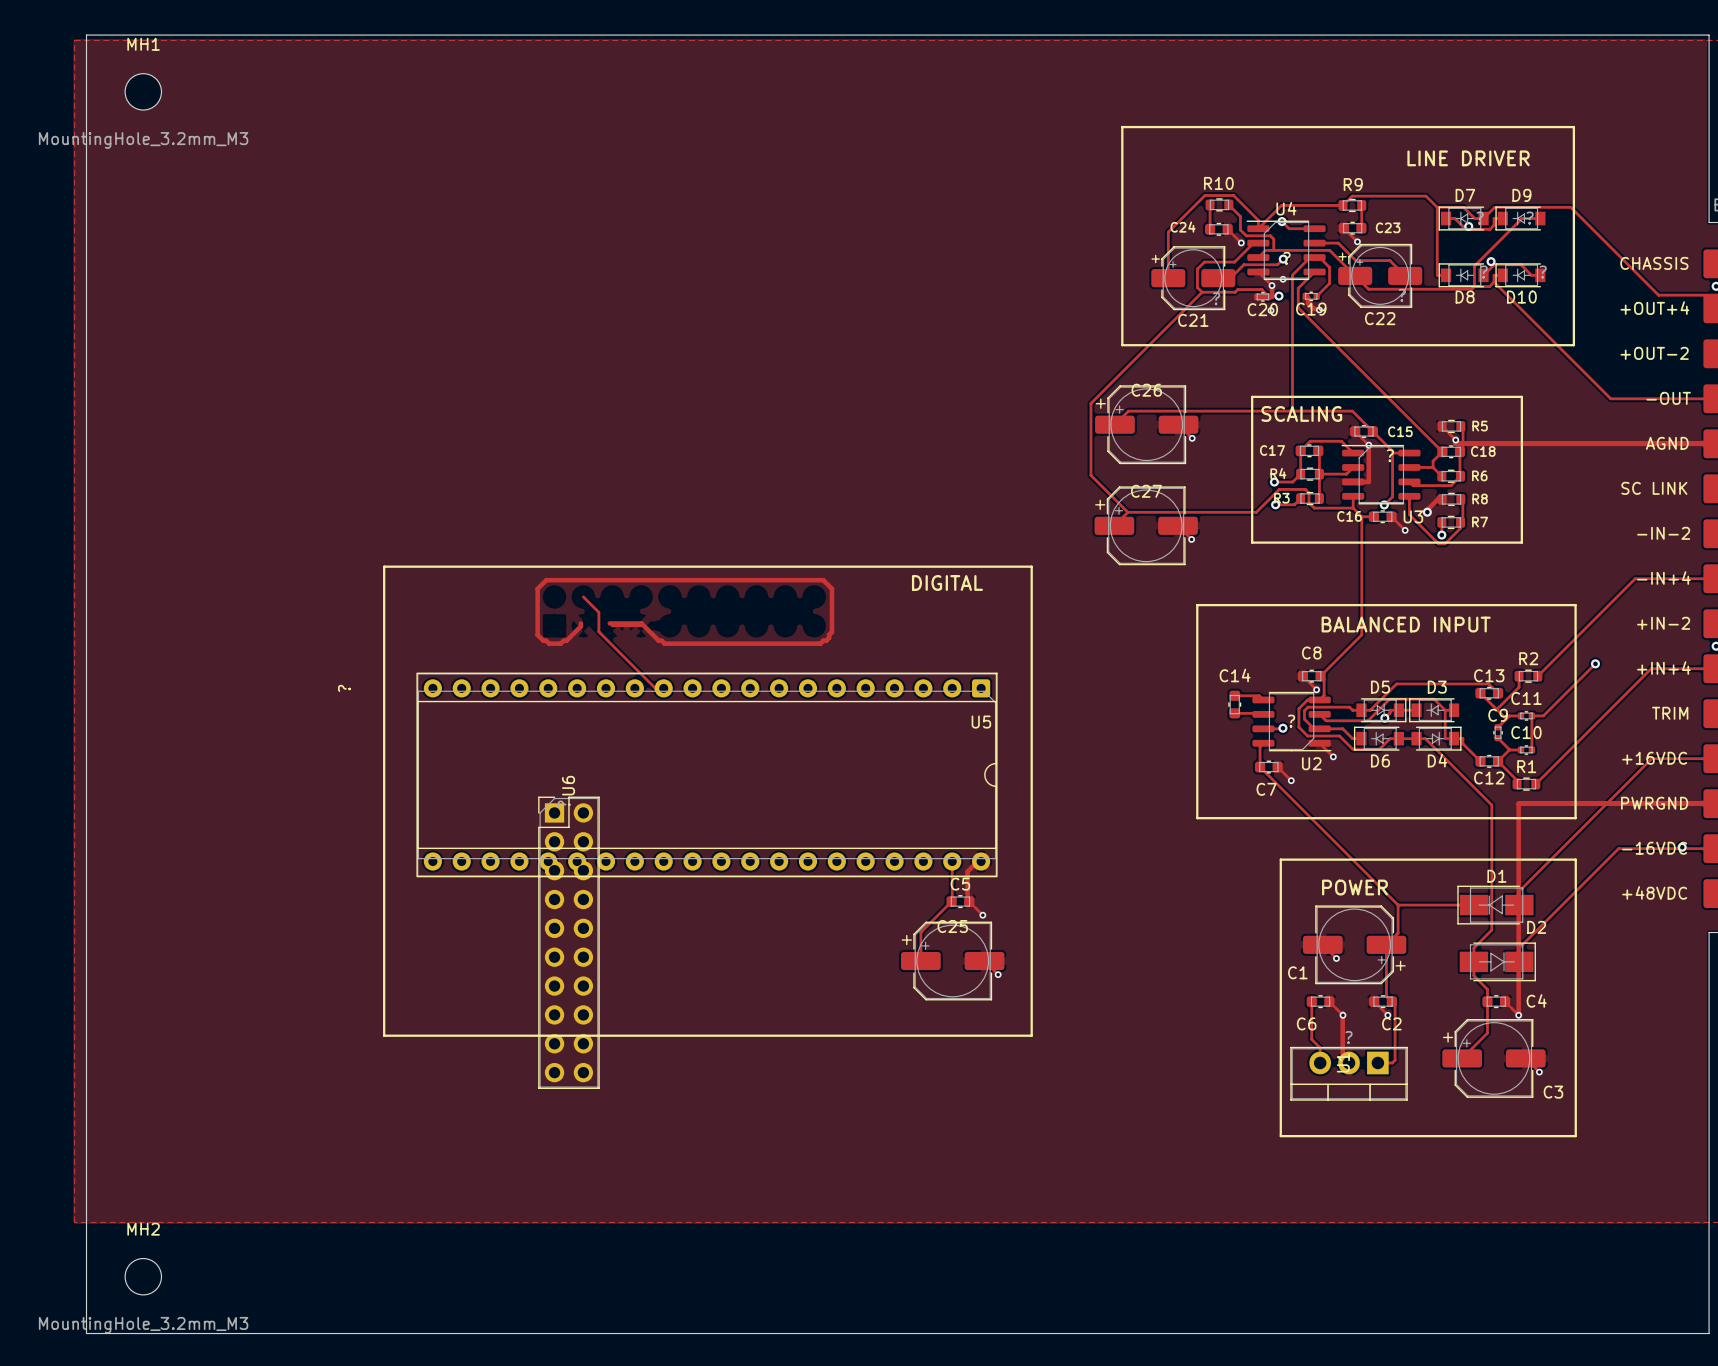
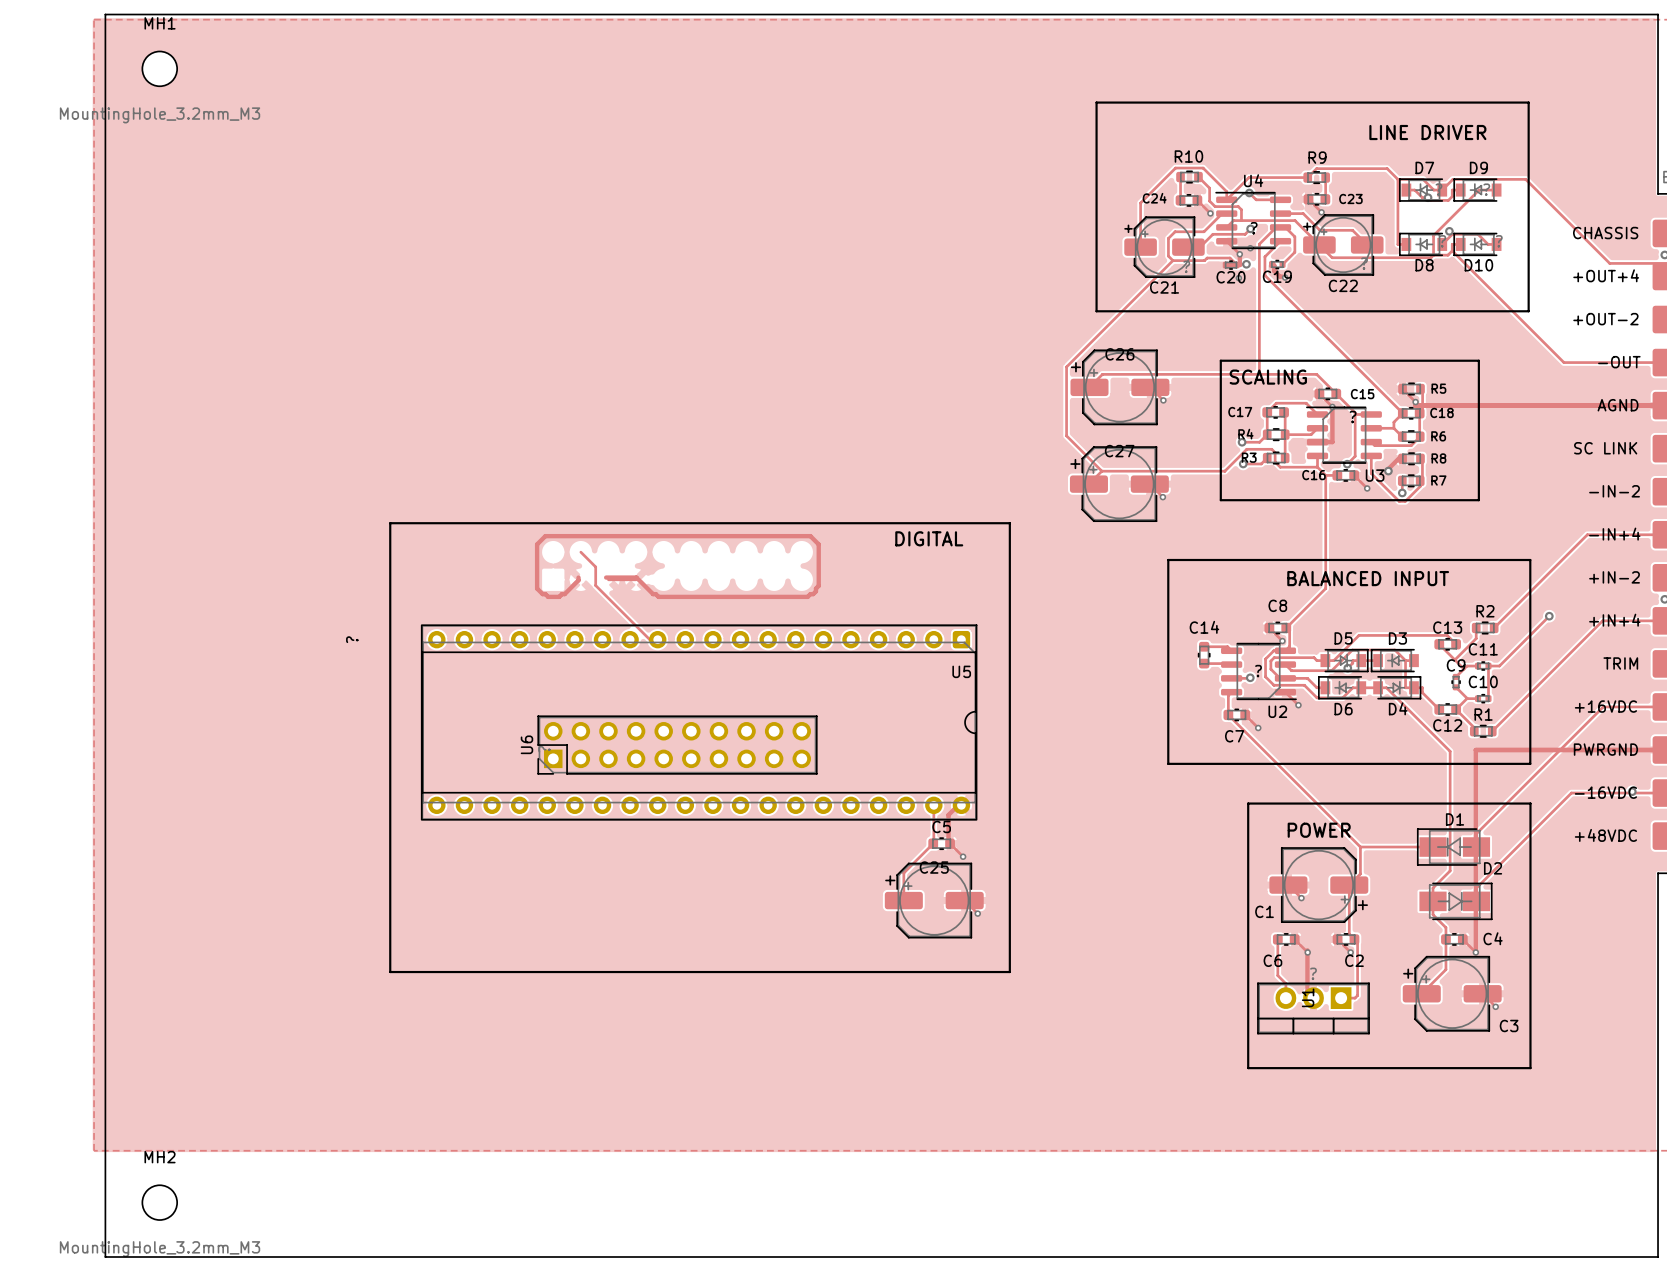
U6 rotation: 0° (568, 942) -> 90° counterclockwise (677, 745)
U6 position: (568, 942) -> (677, 745)

